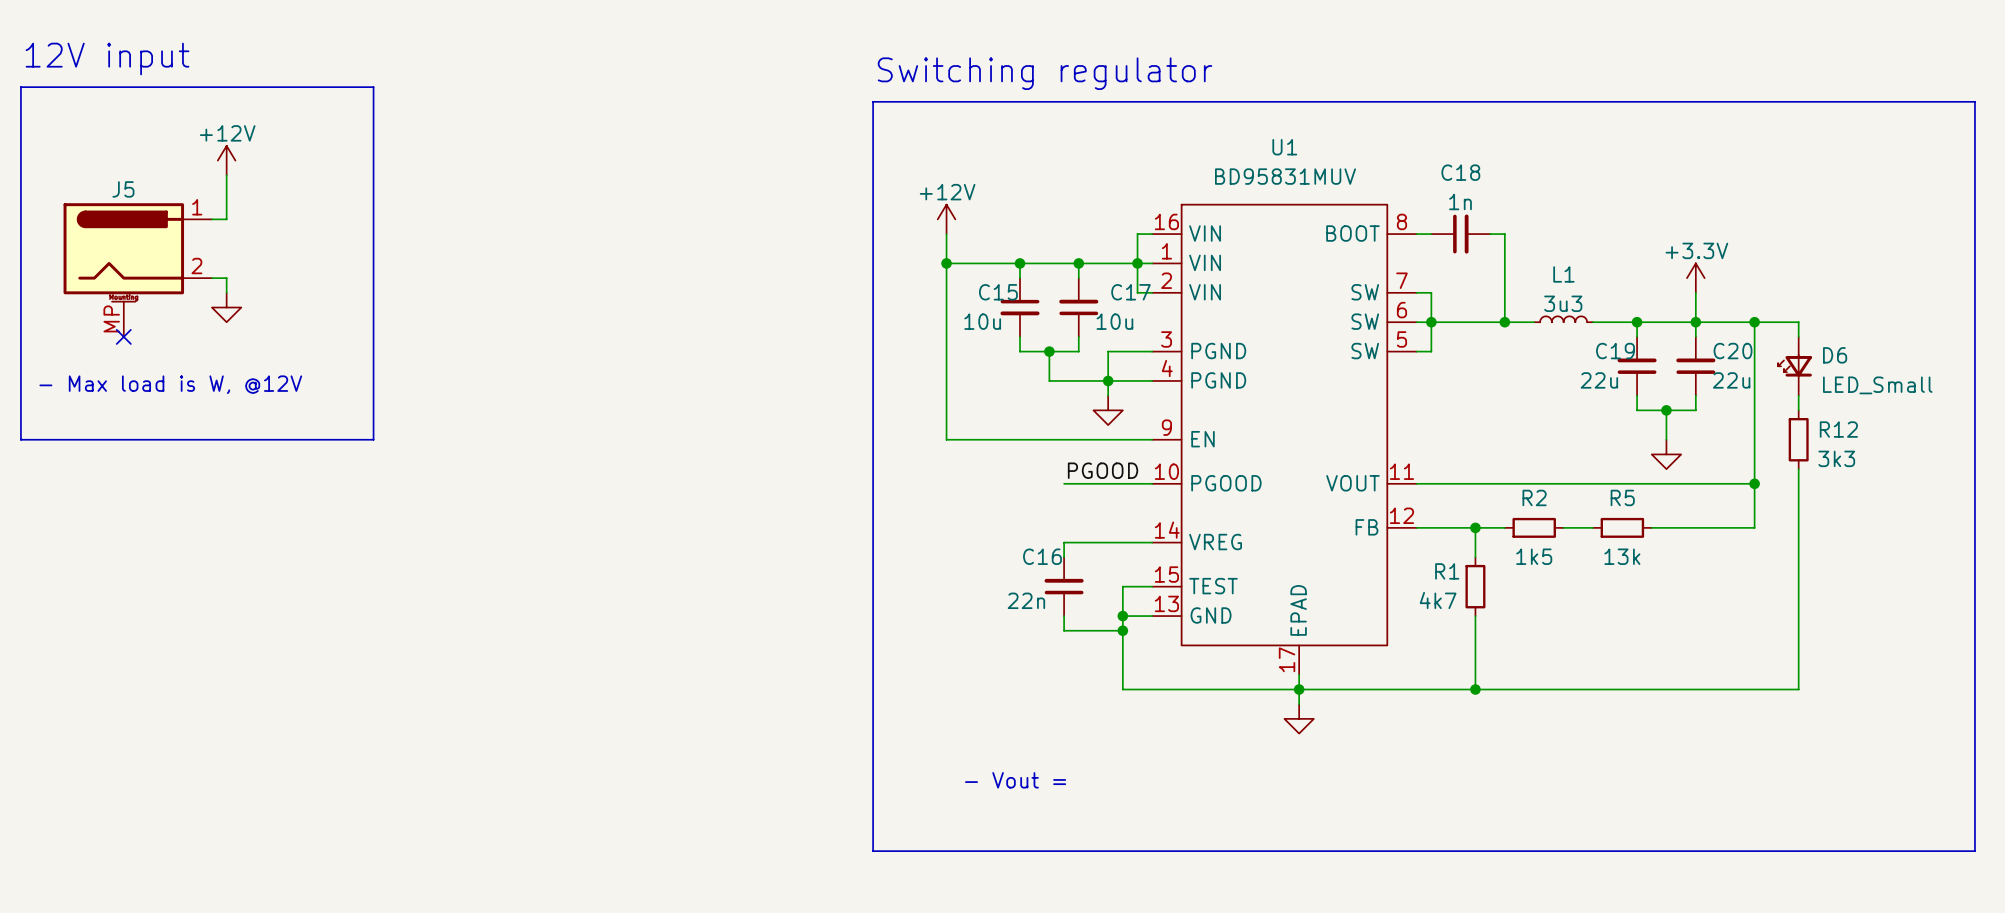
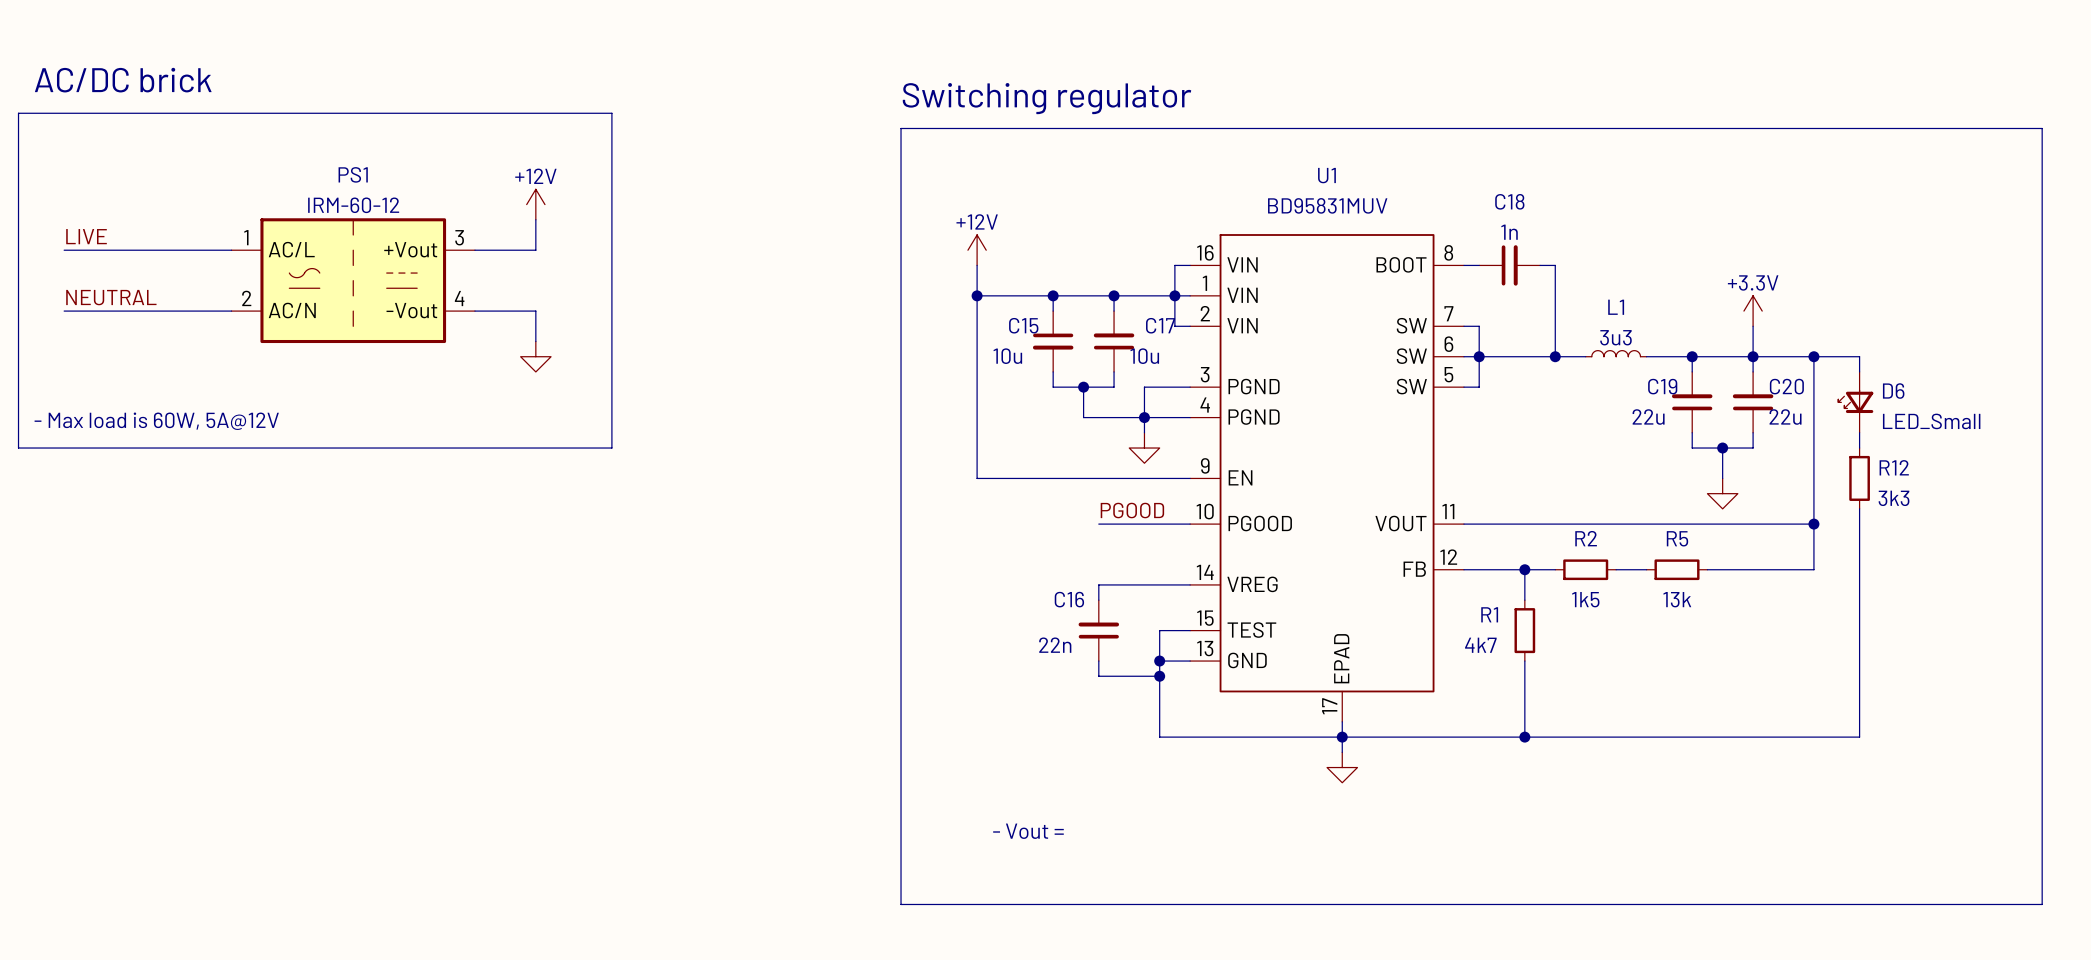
text: none -> AC/DC brick (123, 80)
text: 12V input (107, 59) -> none
line: (373, 87) (373, 439) (20, 439) (20, 410) -> (383, 113) (611, 113) (611, 448) (18, 448)
power symbol: +12V (226, 160) -> none
wire: (226, 175) (226, 219) -> none
power symbol: none -> +12V (535, 204)
wire: none -> (535, 219) (535, 250) (474, 250)
label: none -> LIVE (86, 236)
PS1: none -> IRM-60-12 (353, 280)
label: none -> NEUTRAL (111, 297)
J5: (137, 270) -> none
wire: (226, 278) (226, 292) -> none
wire: none -> (474, 311) (535, 311) (535, 341)
power symbol: (226, 307) -> none
power symbol: none -> (535, 356)
no-connect mark: (123, 336) -> none
text: - Max load is W, @12V (170, 384) -> - Max load is 60W, 5A@12V (156, 421)

